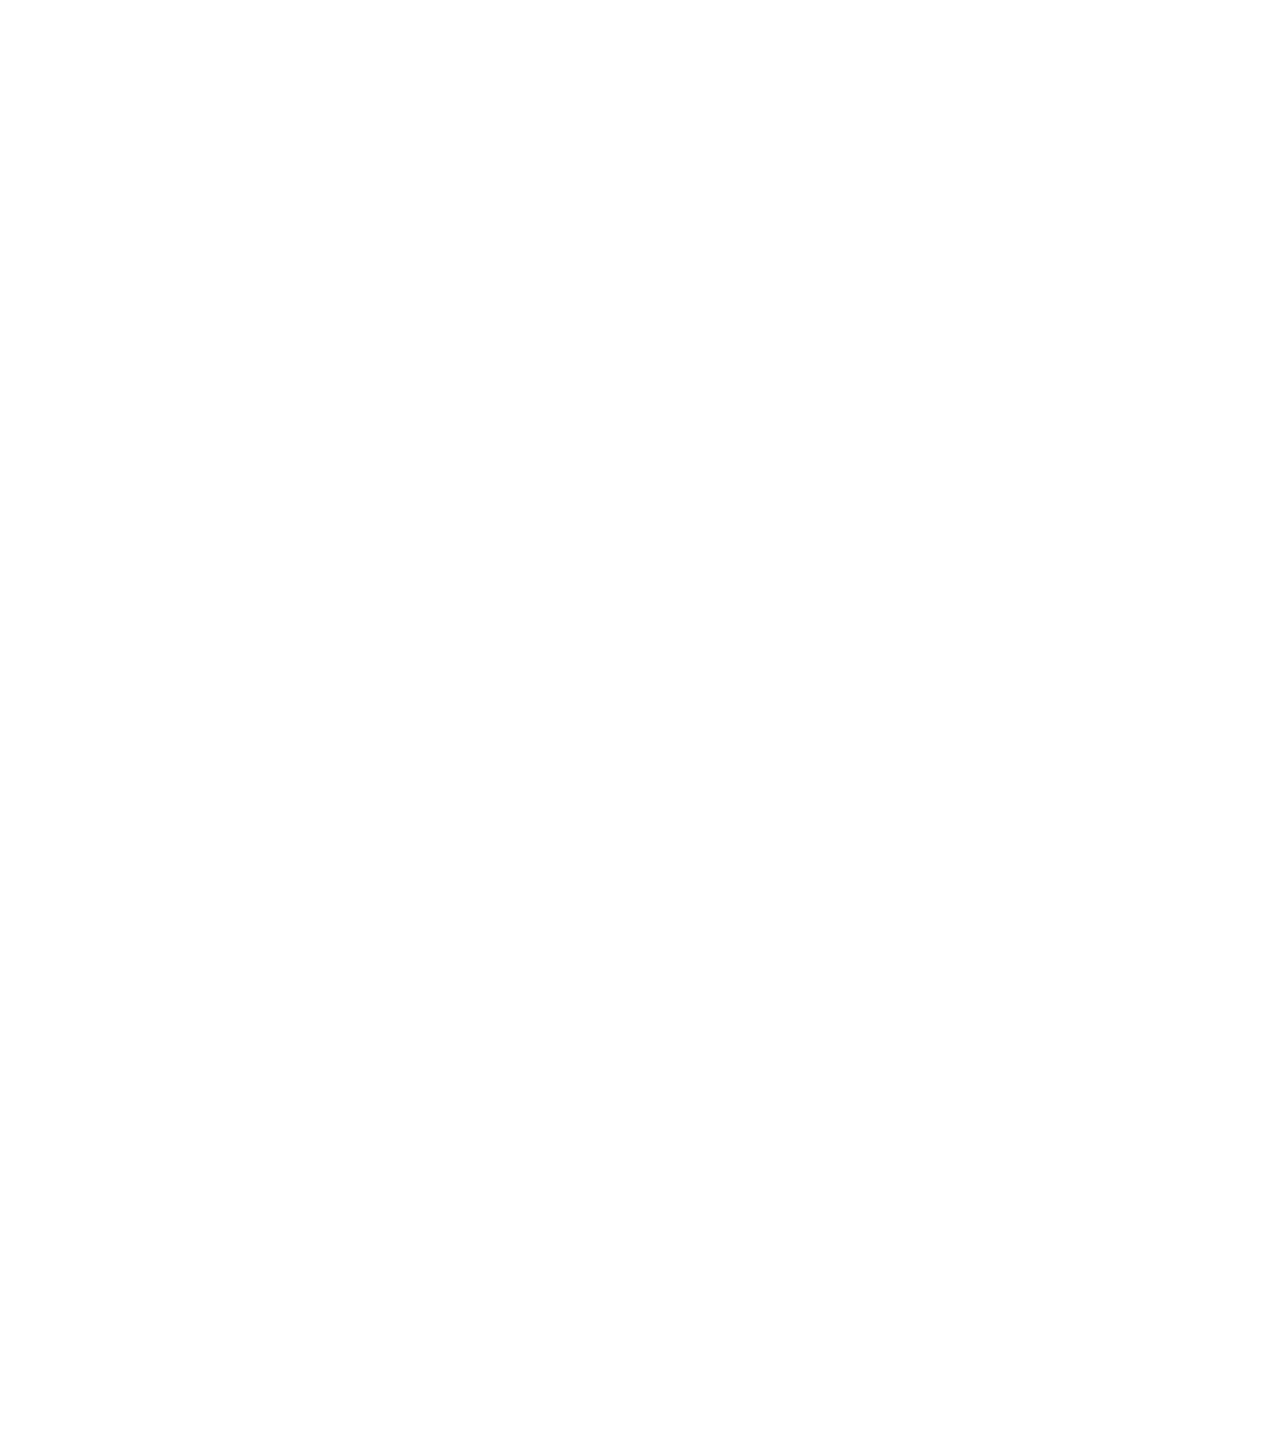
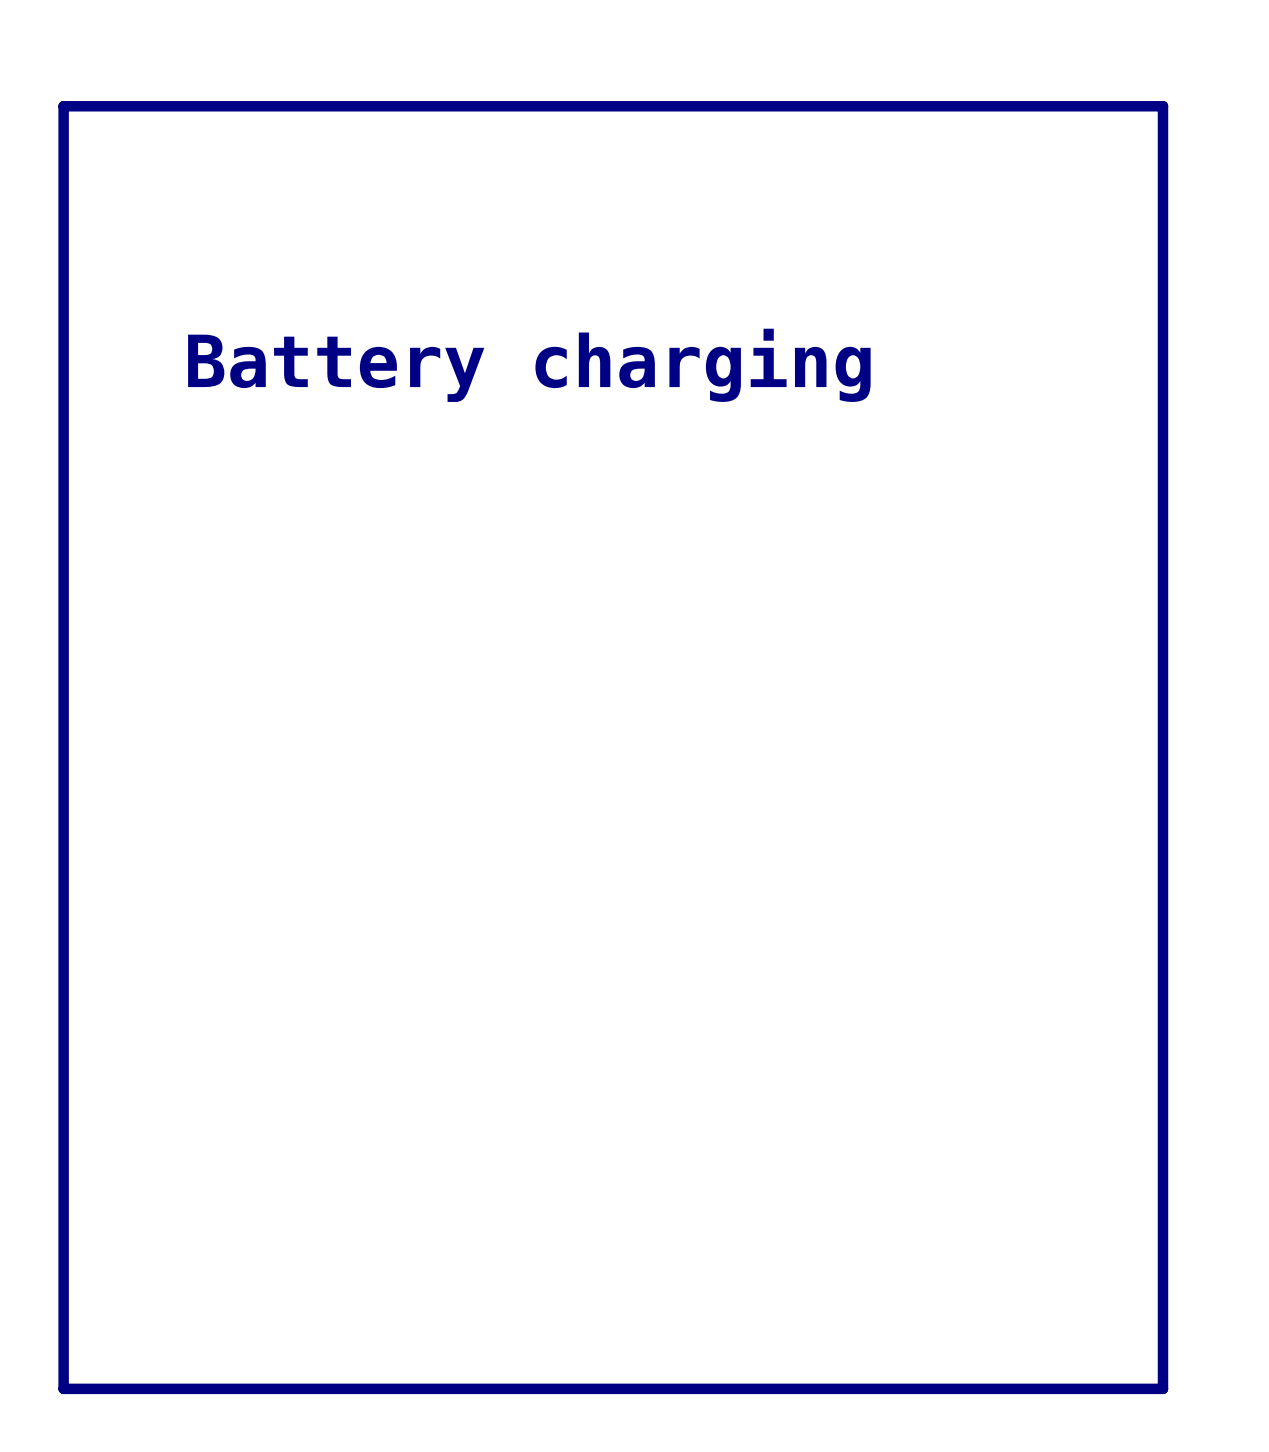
line: none -> (63, 106) (1163, 106) (1163, 1388) (63, 1388) (63, 106)
text: none -> Battery charging (529, 365)

